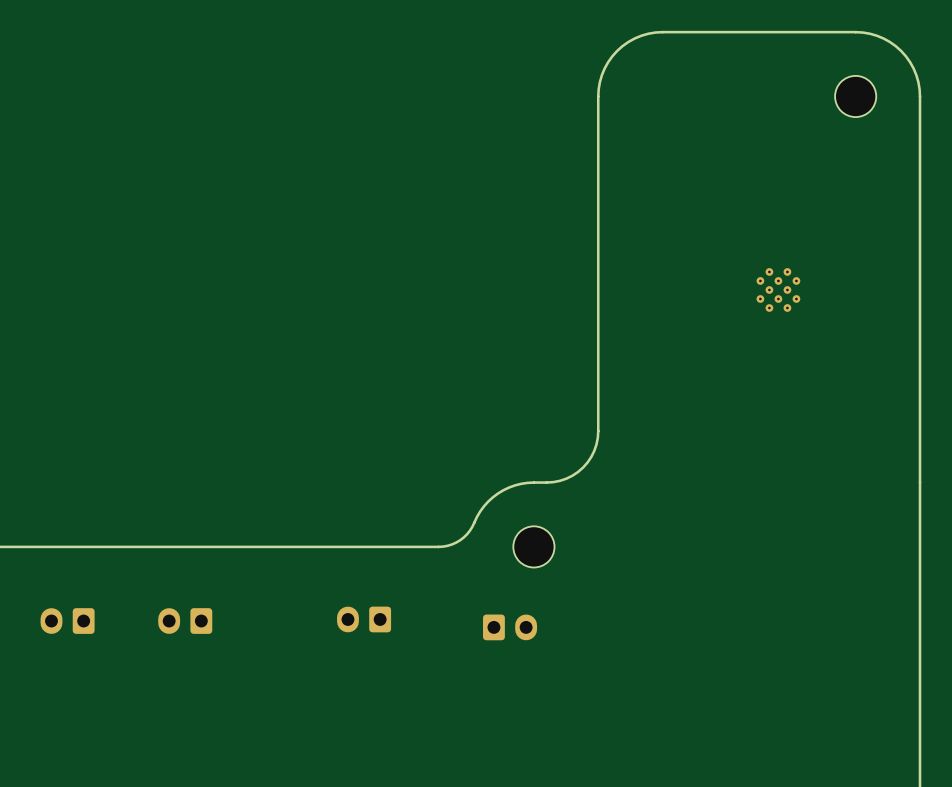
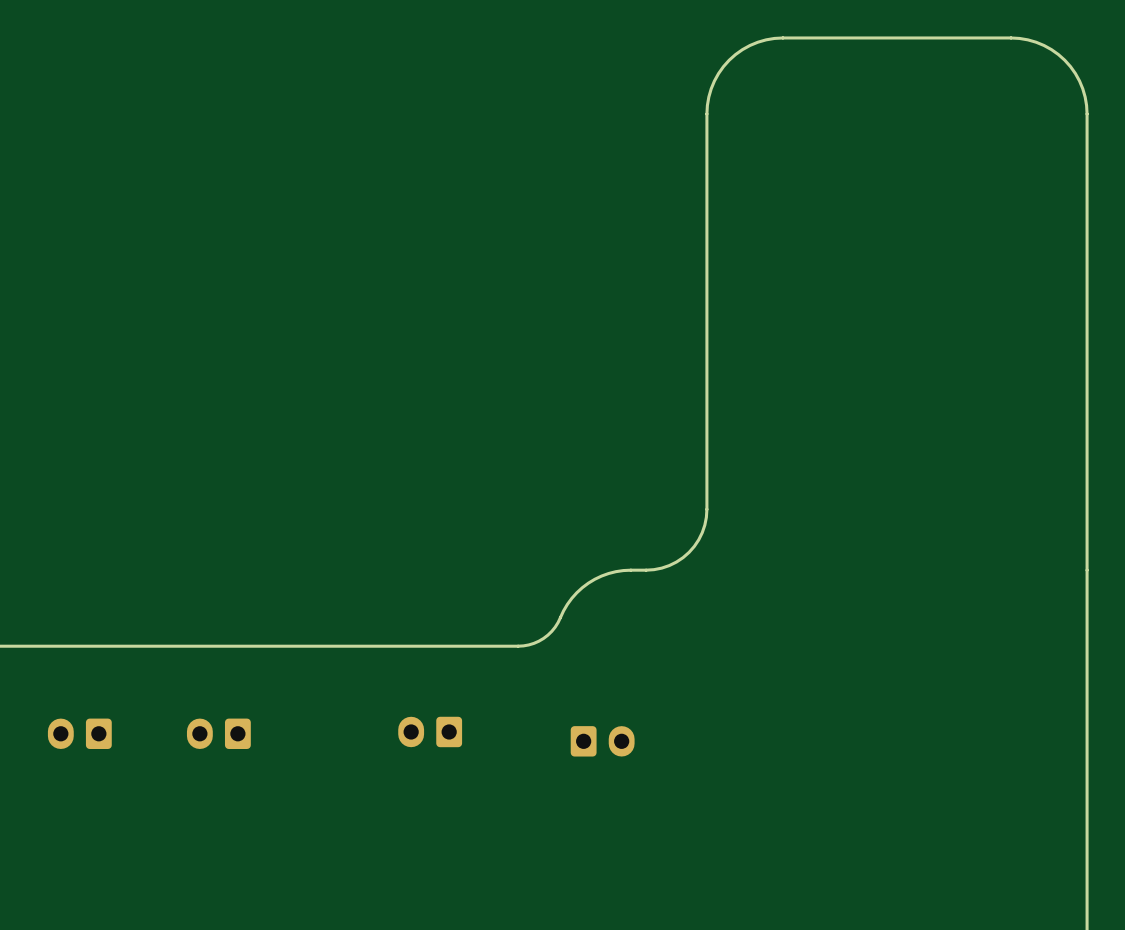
part: (855, 96) -> none
part: (778, 289) -> none
part: (533, 546) -> none

